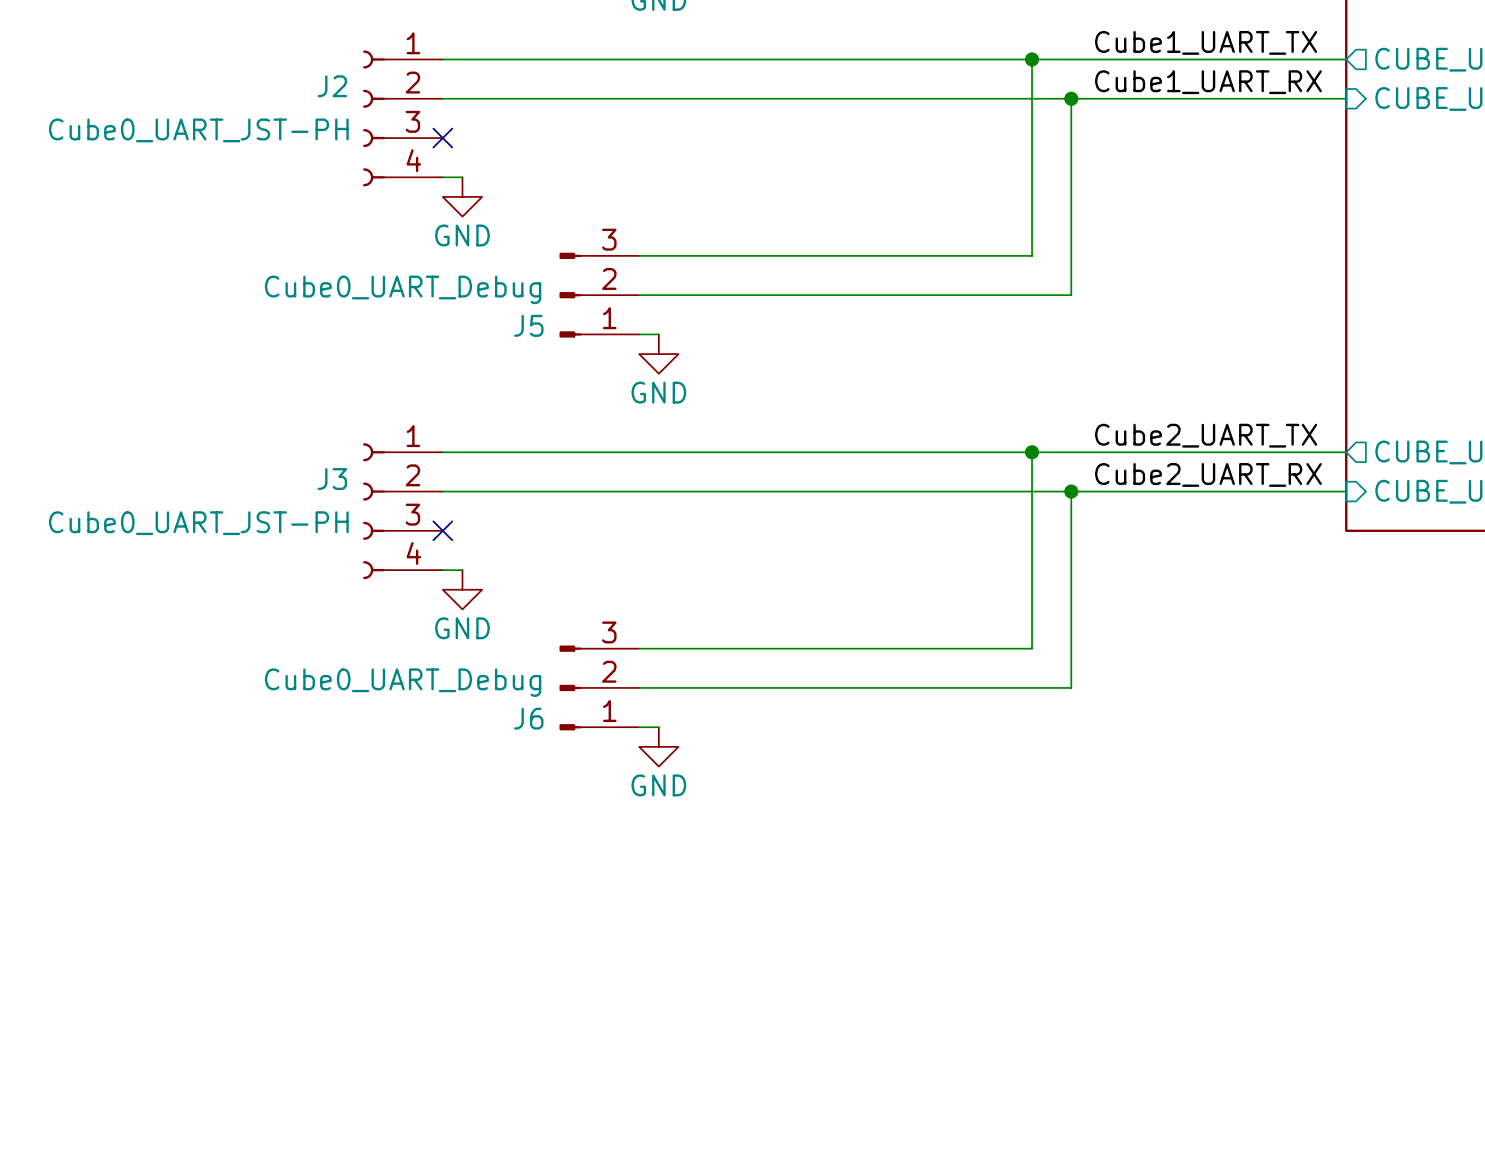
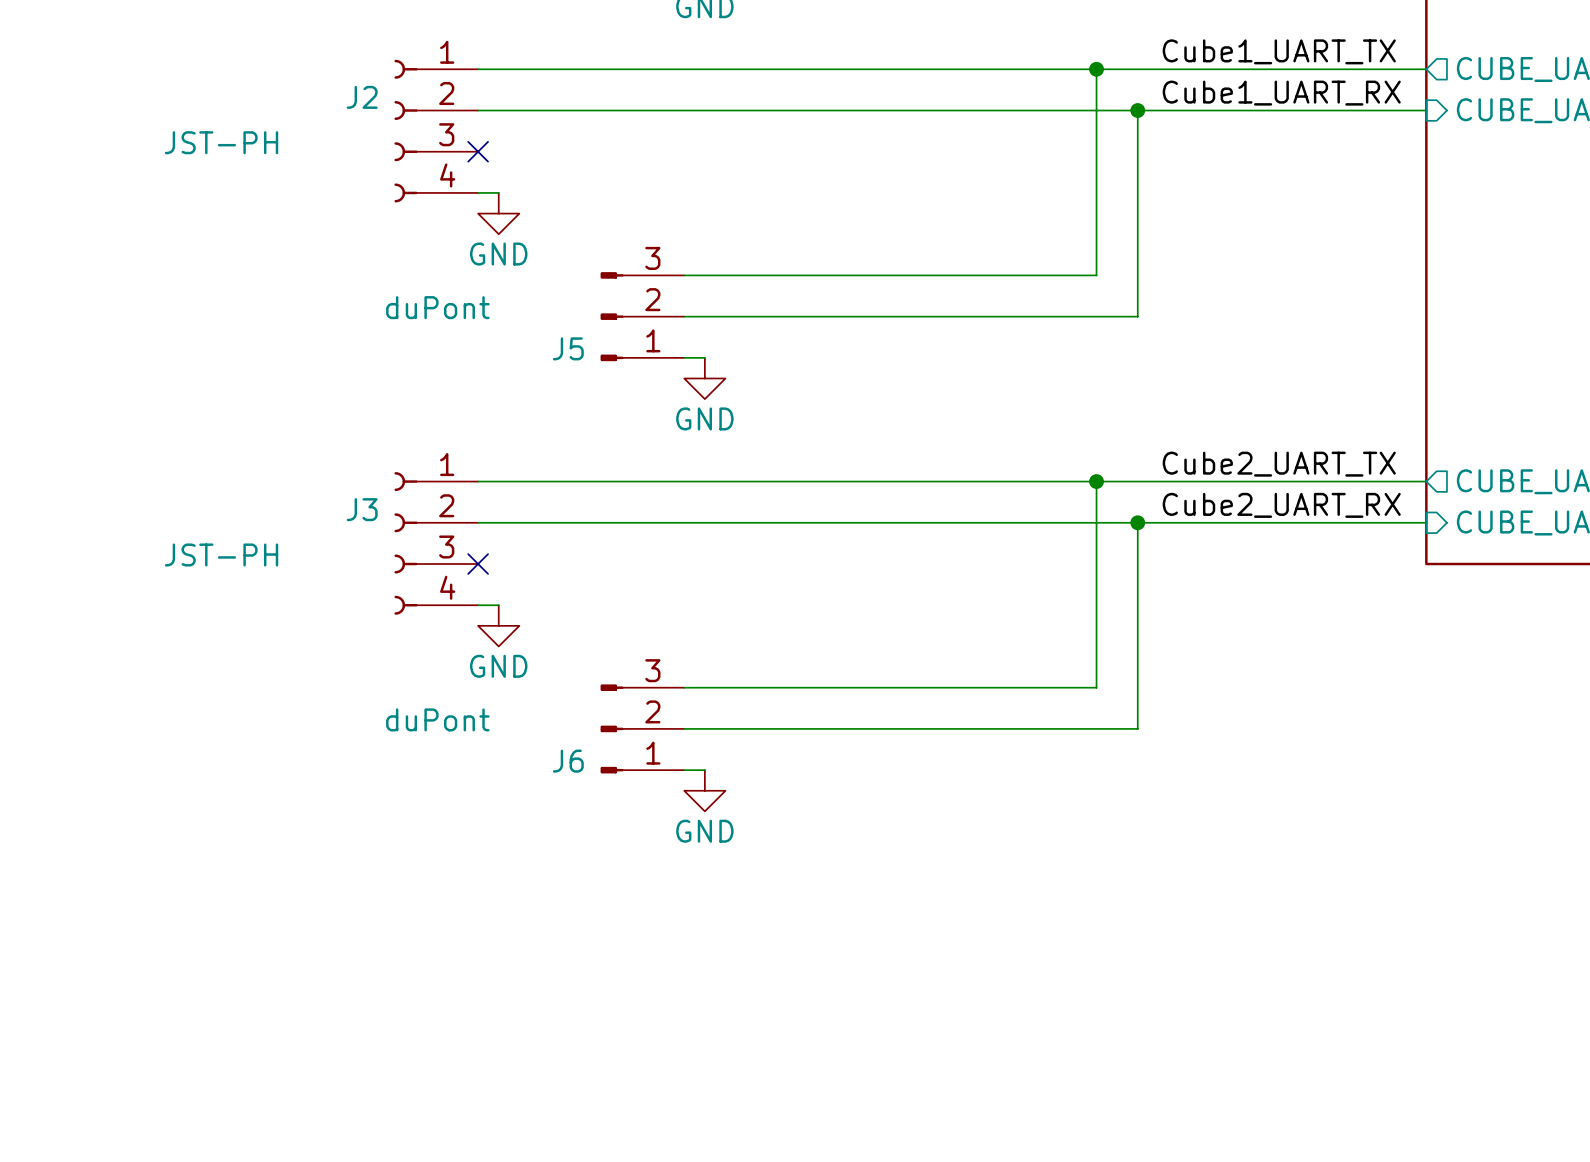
J2 value: Cube0_UART_JST-PH (198, 130) -> JST-PH (221, 142)
J5 value: Cube0_UART_Debug (403, 289) -> duPont (437, 307)
J3 value: Cube0_UART_JST-PH (198, 523) -> JST-PH (221, 554)
J6 value: Cube0_UART_Debug (403, 682) -> duPont (437, 719)

